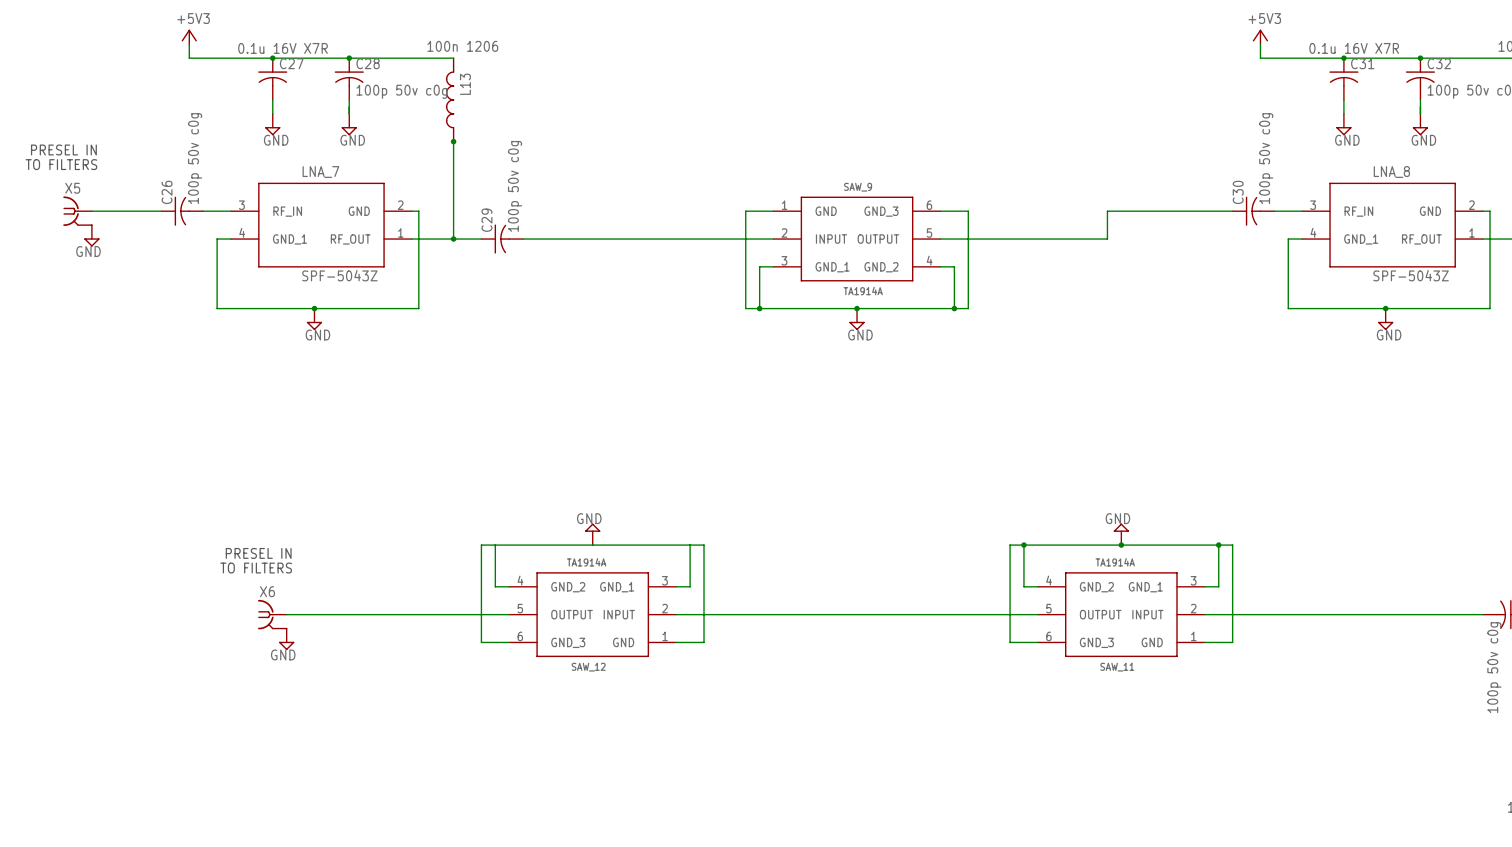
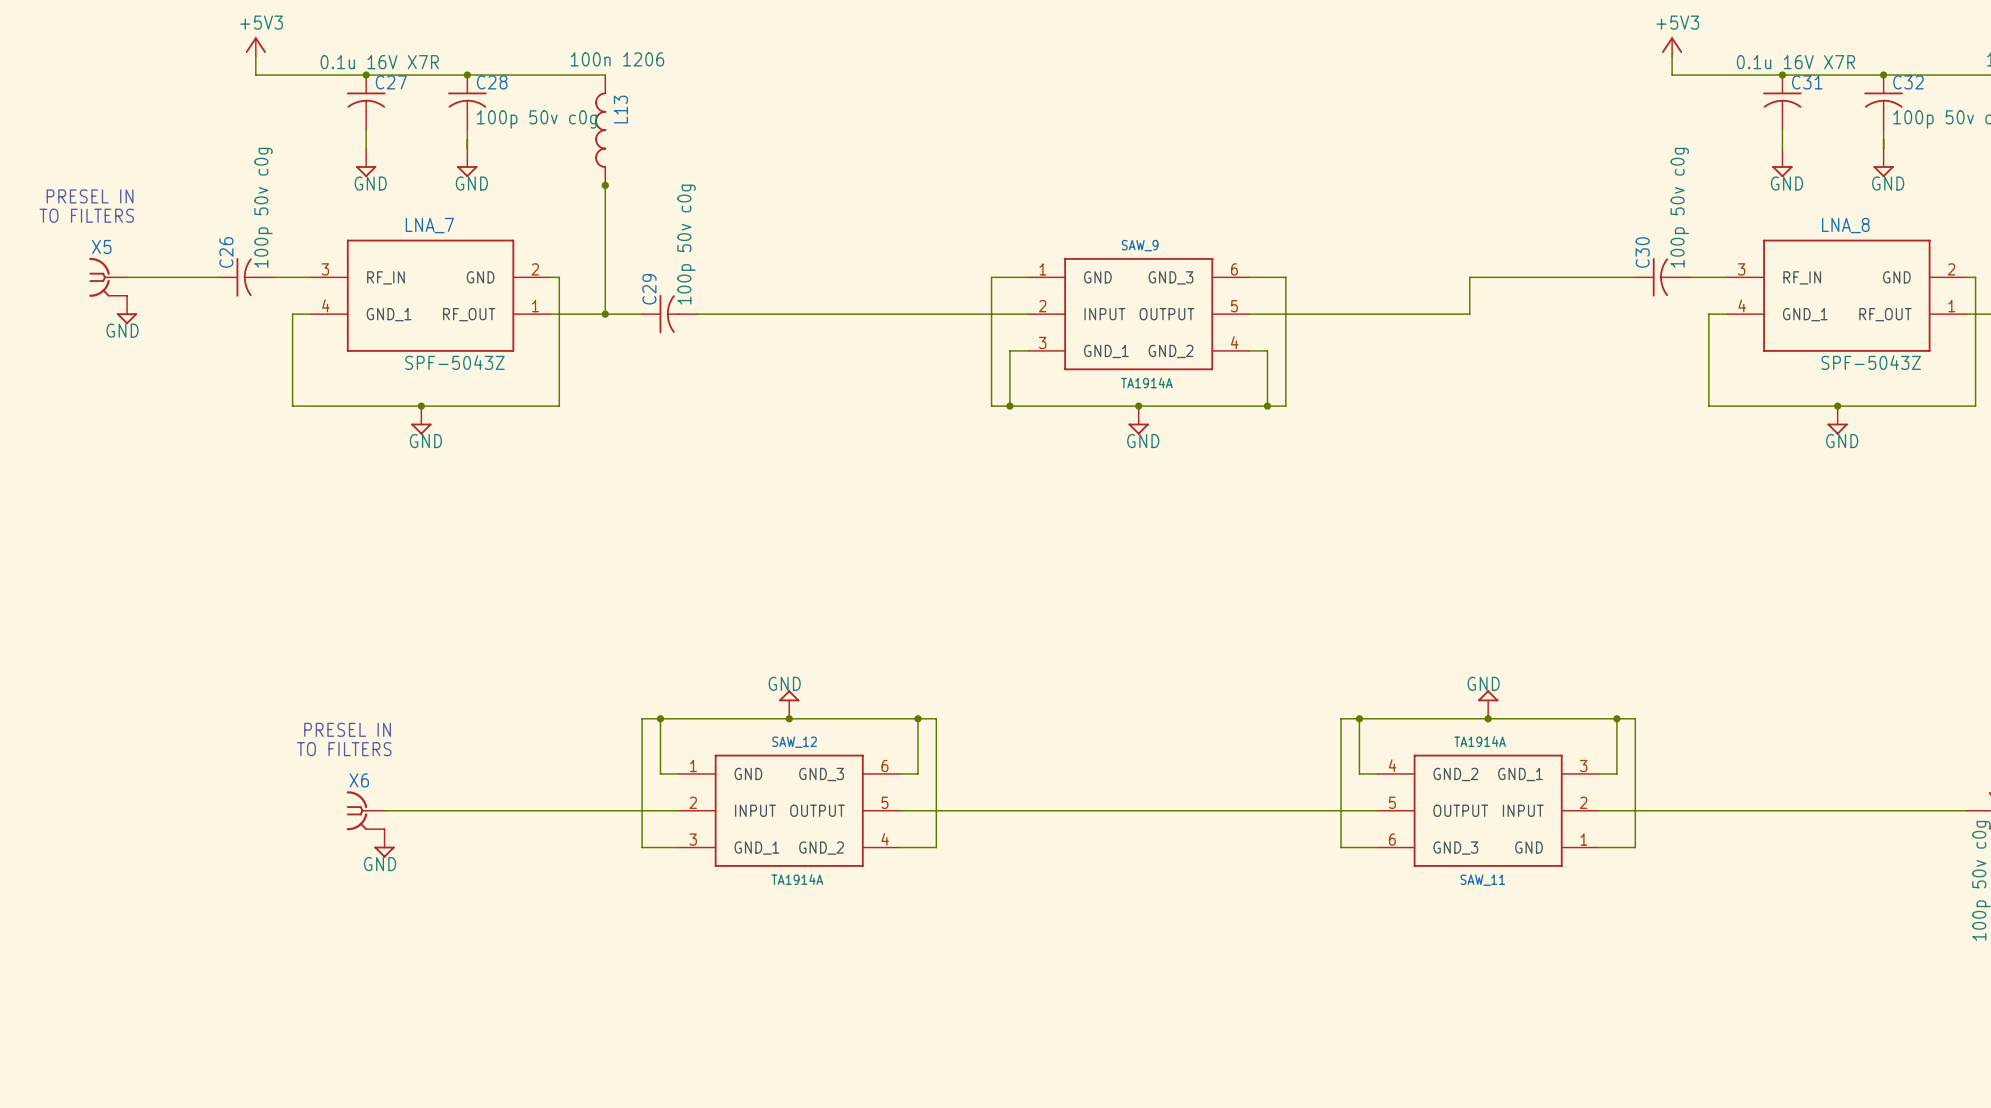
junction: none -> (660, 718)
junction: none -> (789, 718)
junction: none -> (917, 718)
SAW_12 rotation: 0° (592, 614) -> 180° (789, 810)

